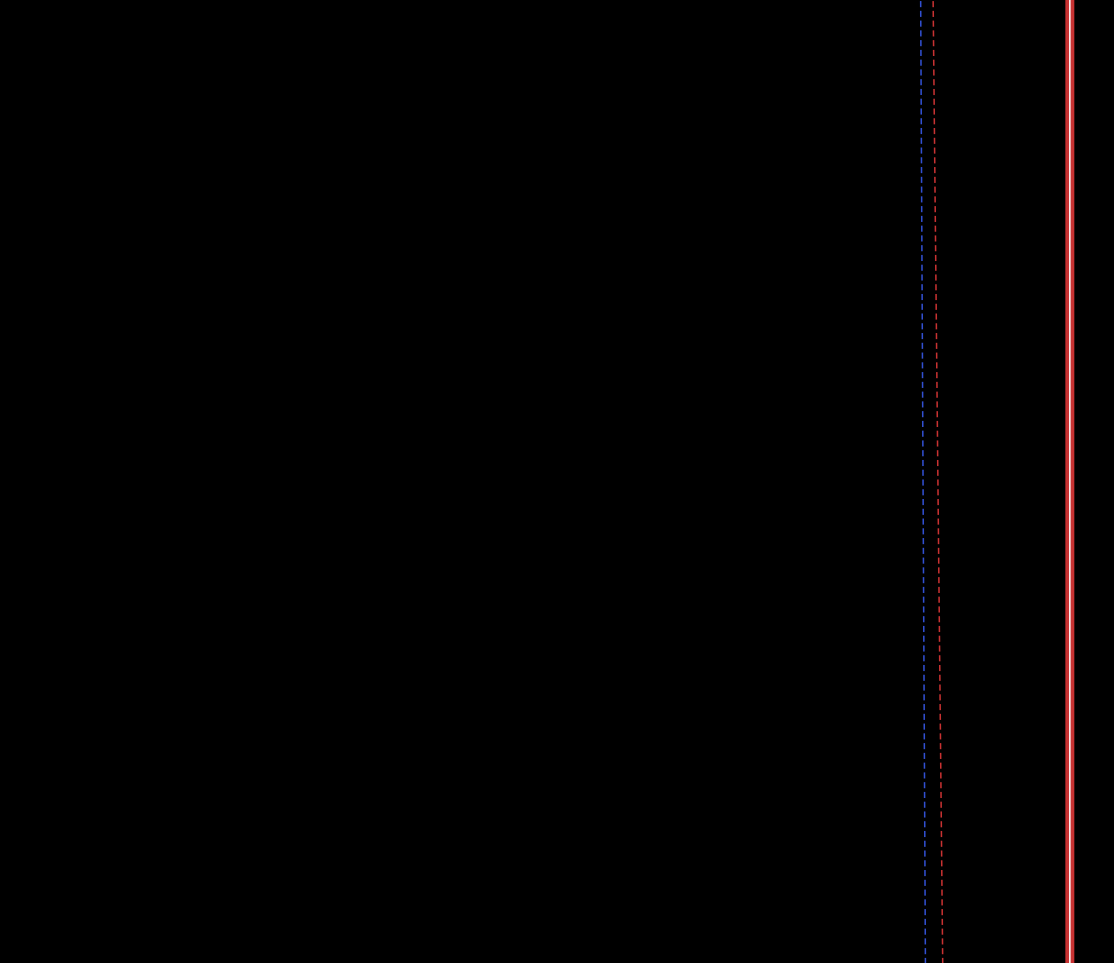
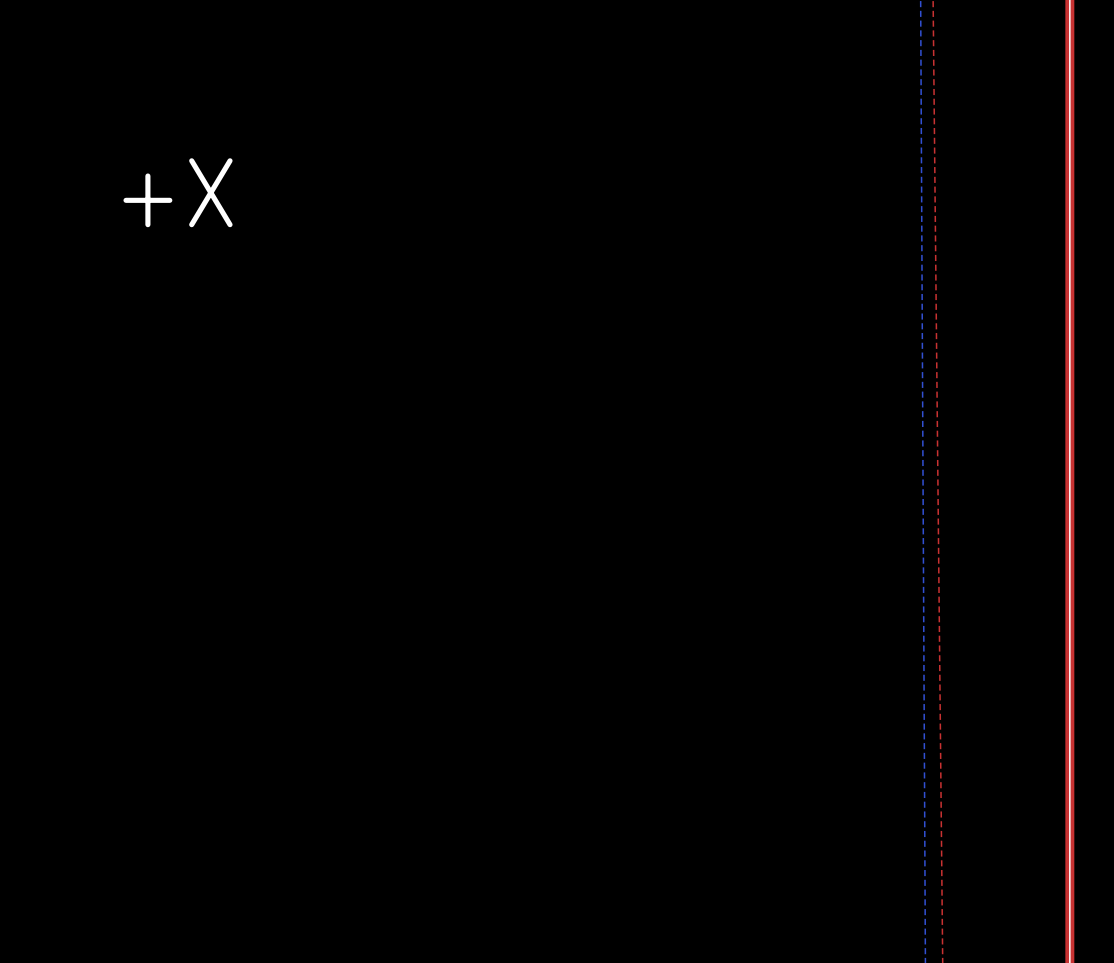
text: none -> +X (178, 192)

